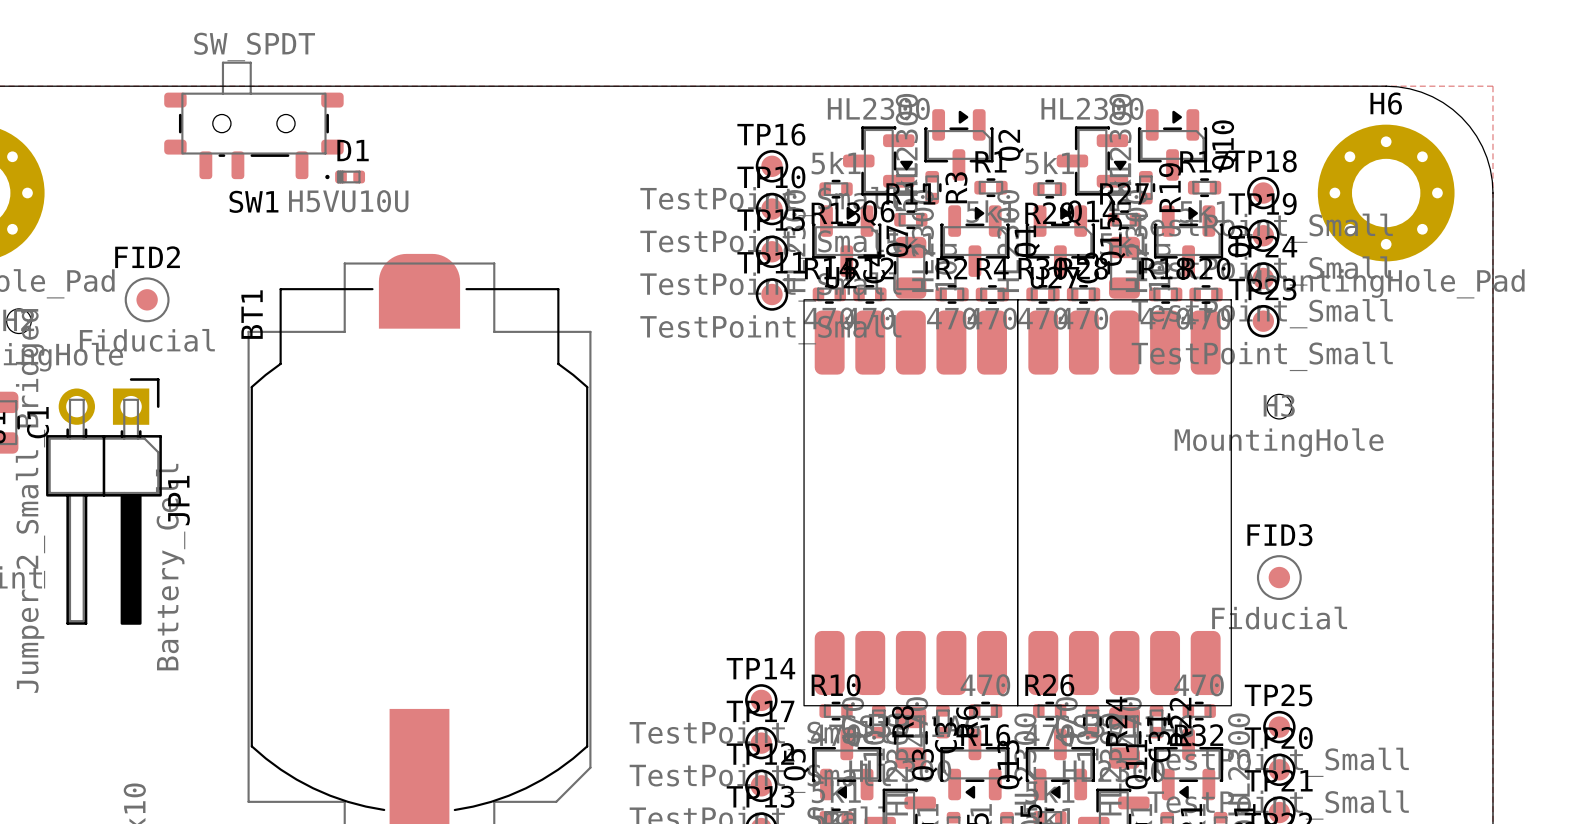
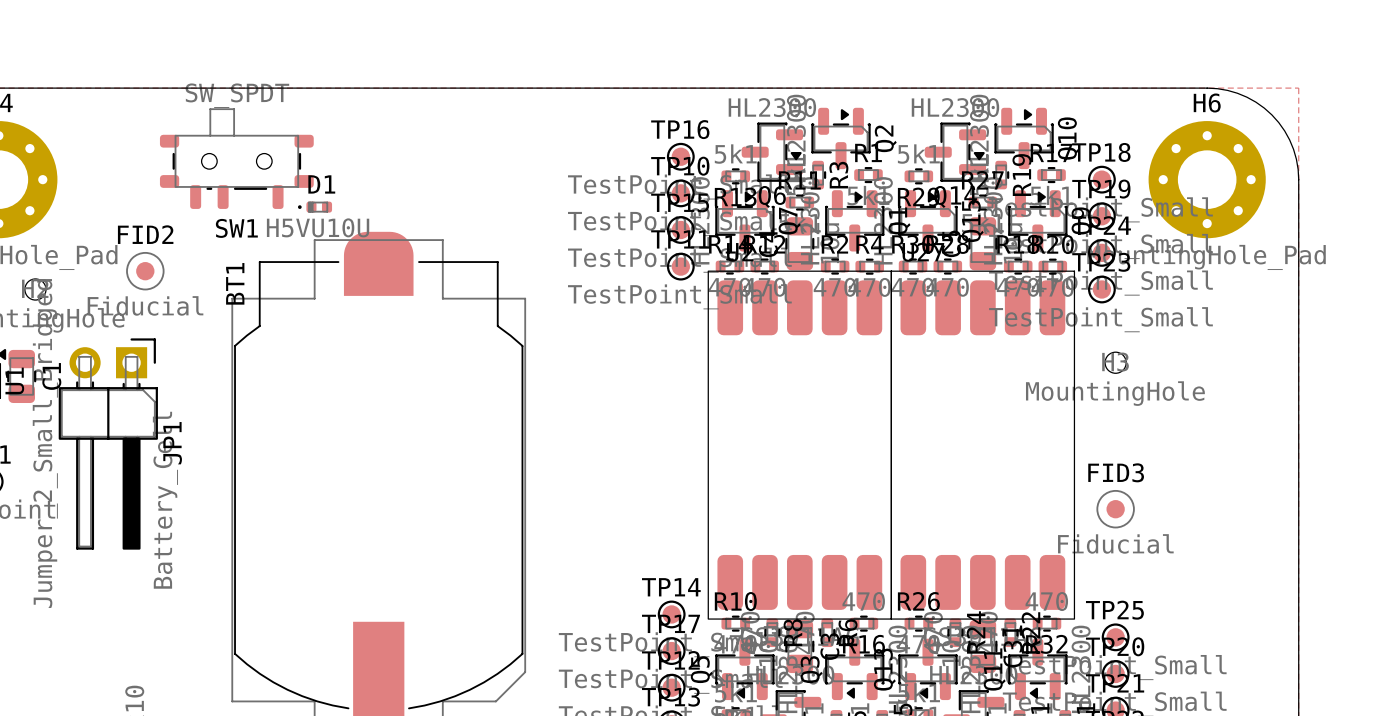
SW1 position: (253, 120) -> (236, 158)
D1 position: (345, 176) -> (315, 207)

